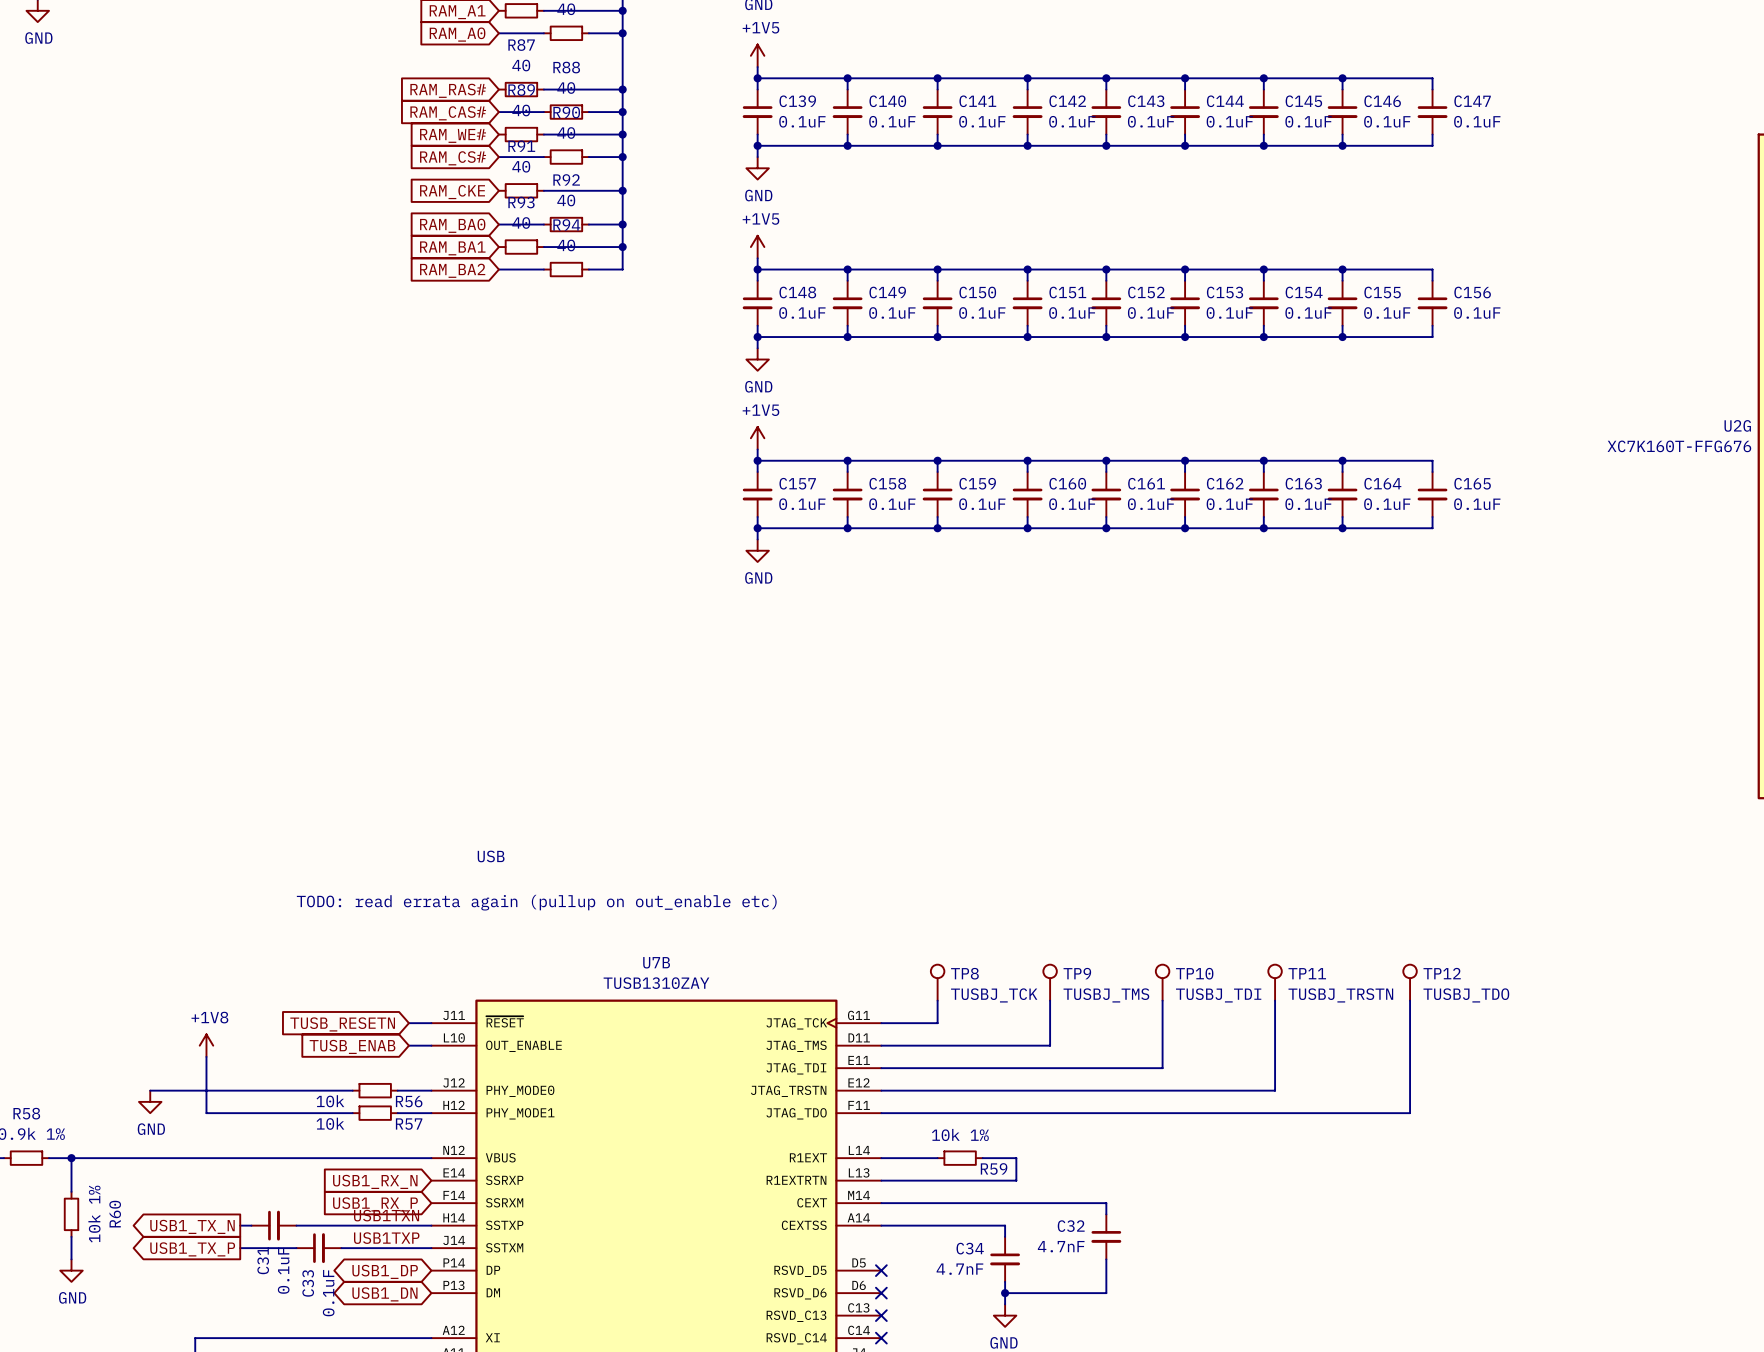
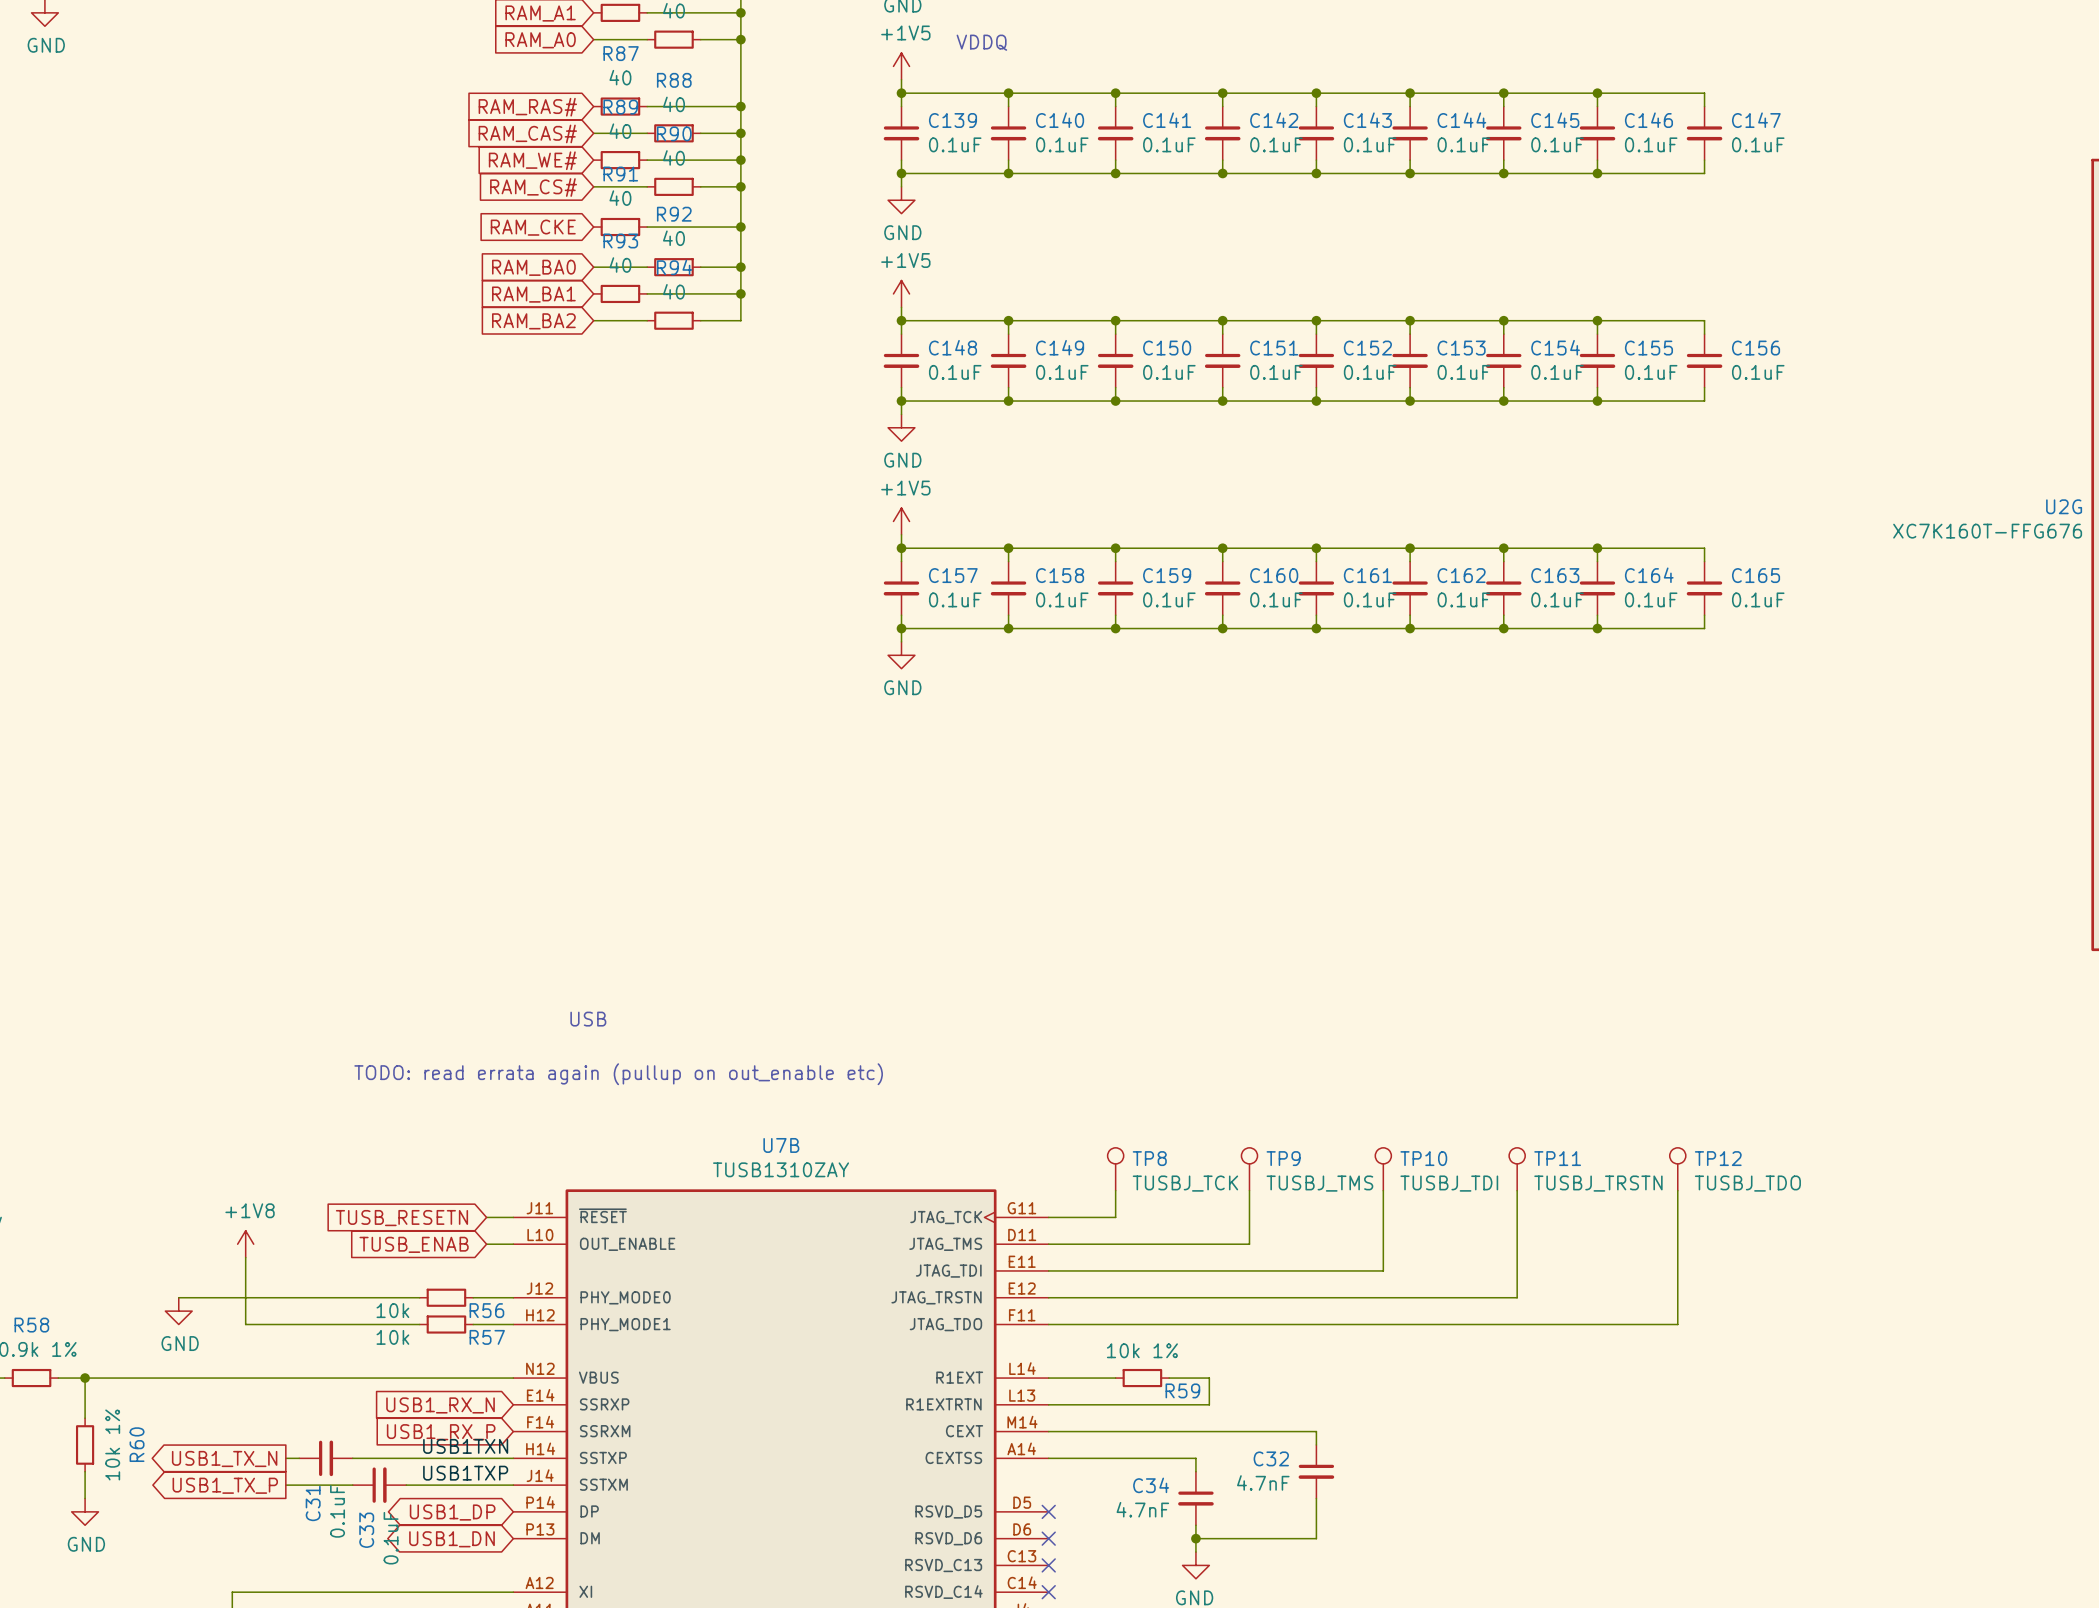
text: none -> VDDQ (981, 42)

